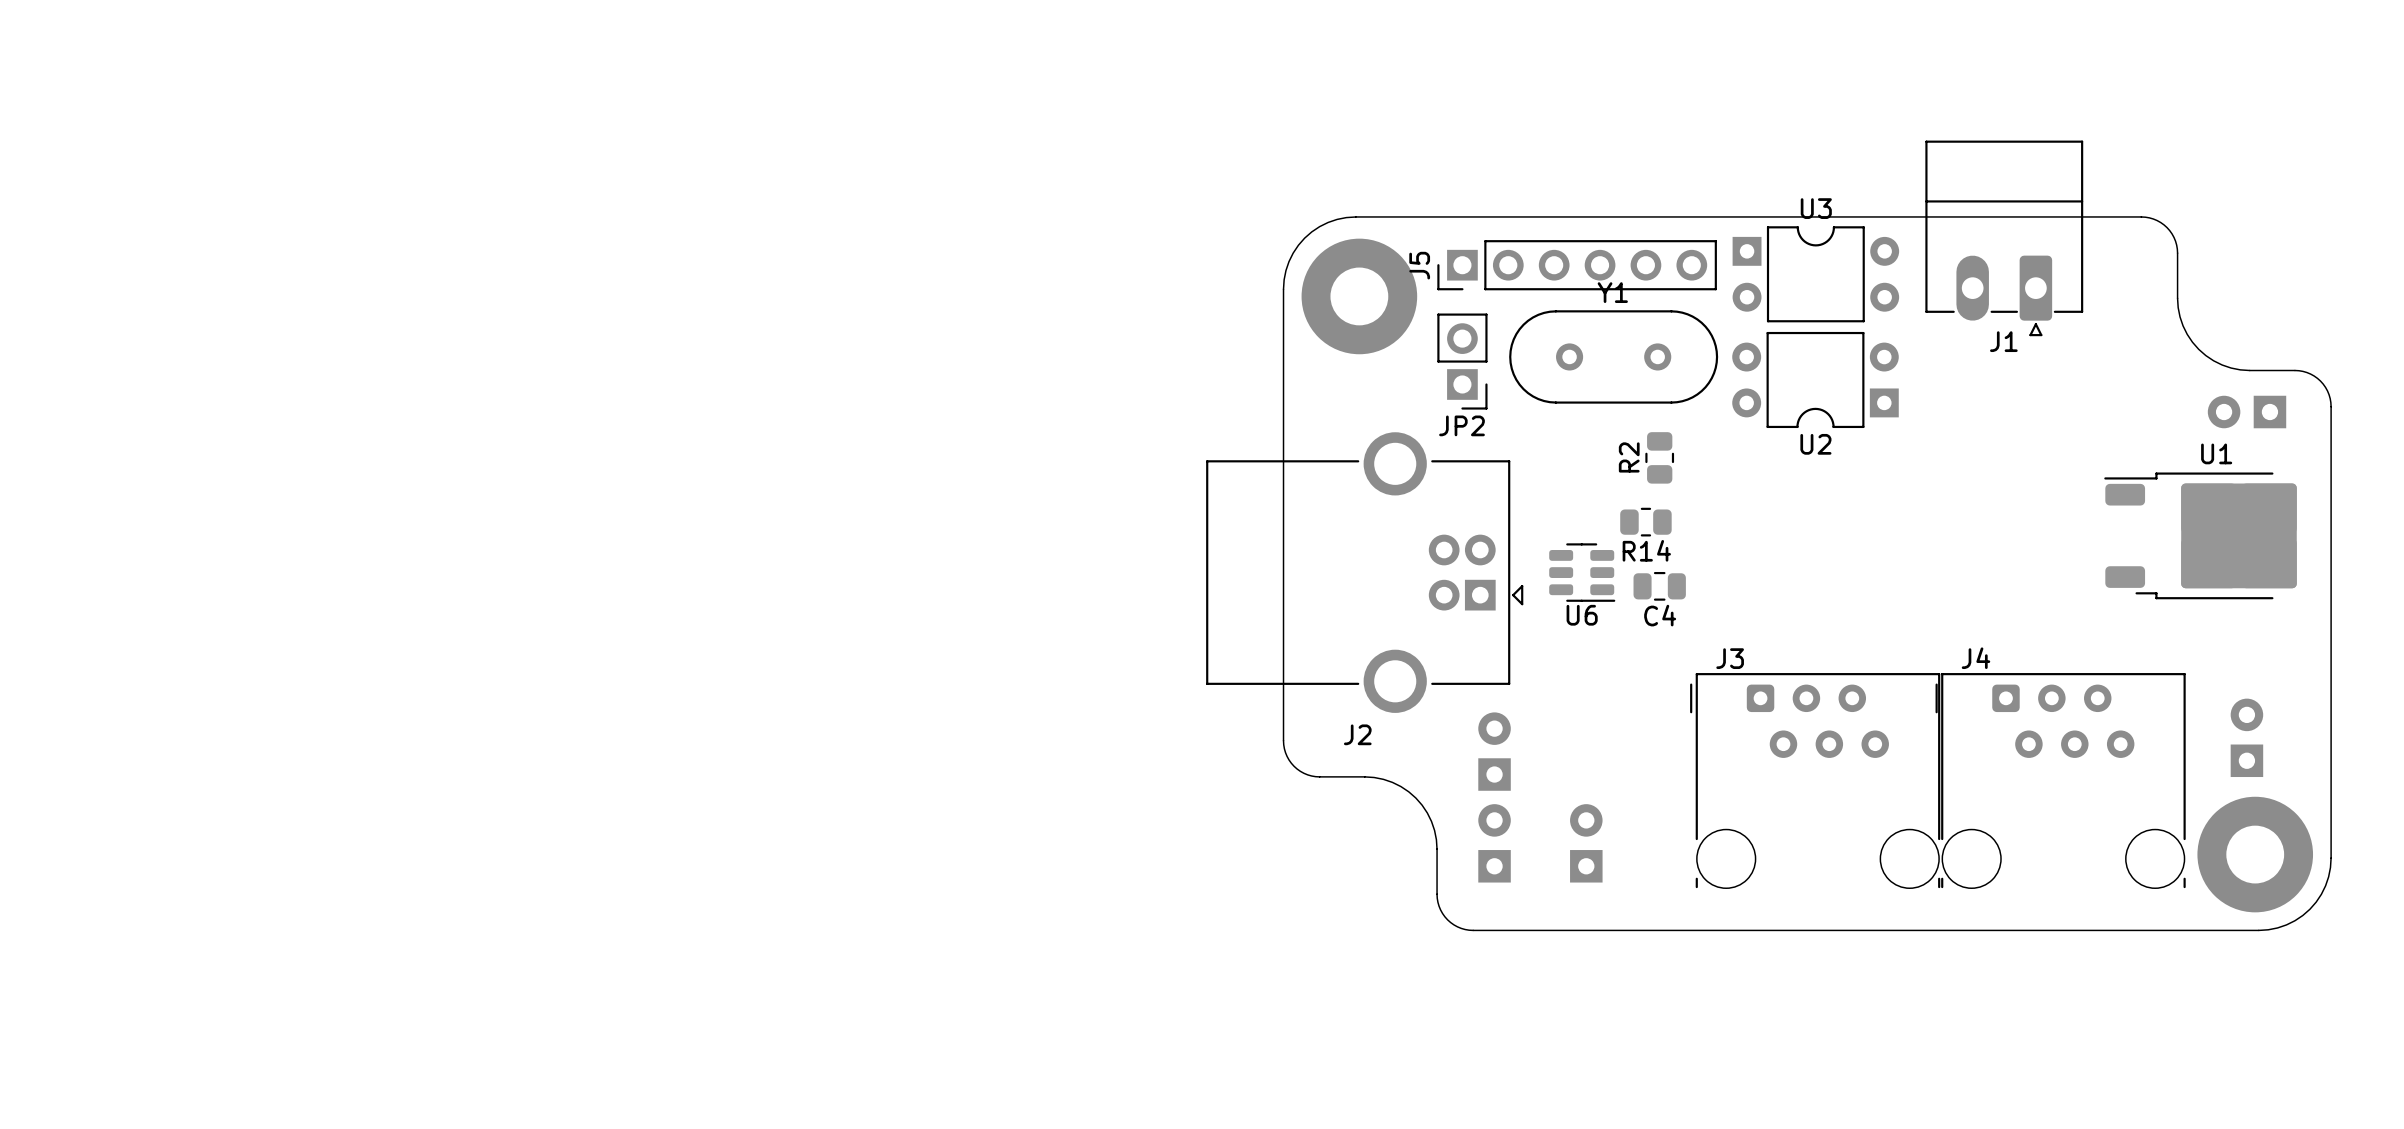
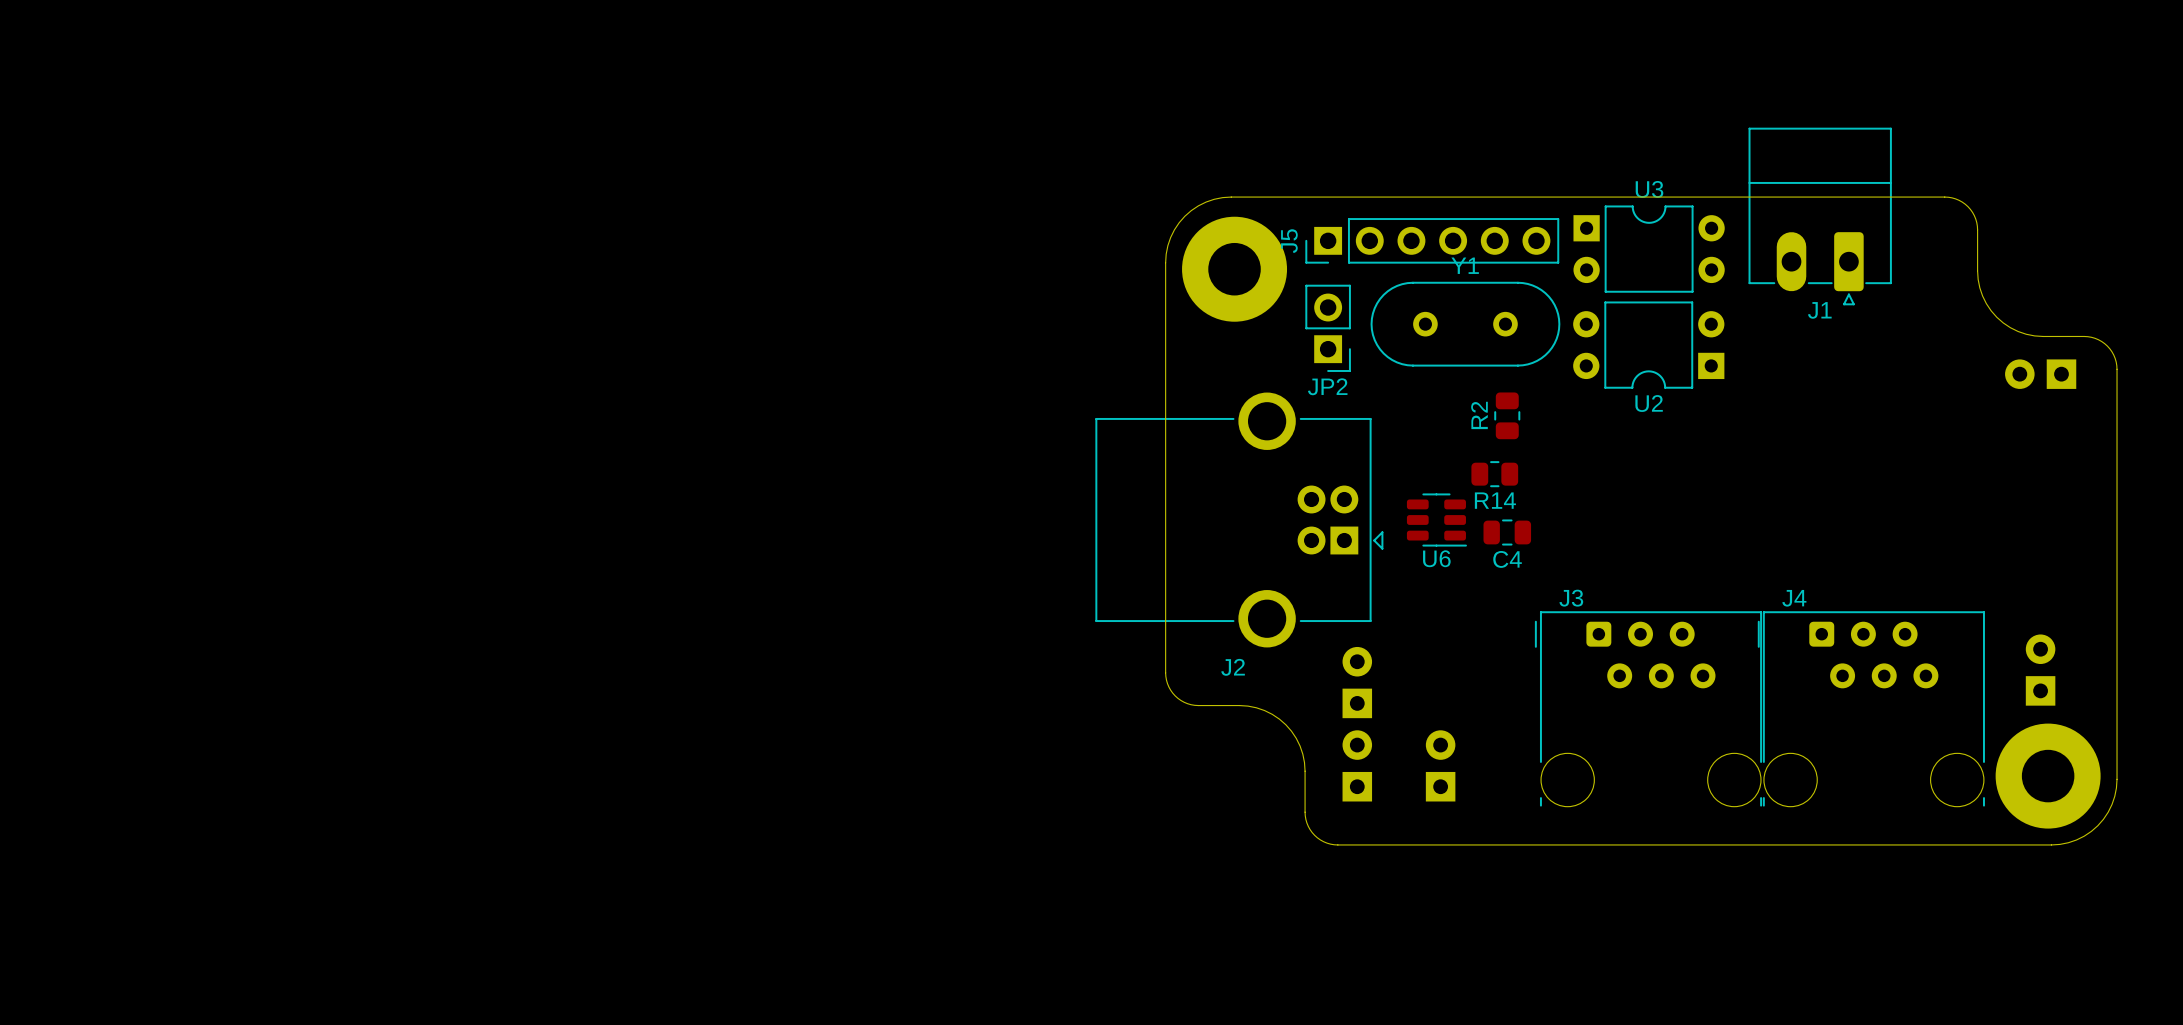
U1: (2200, 535) -> none

